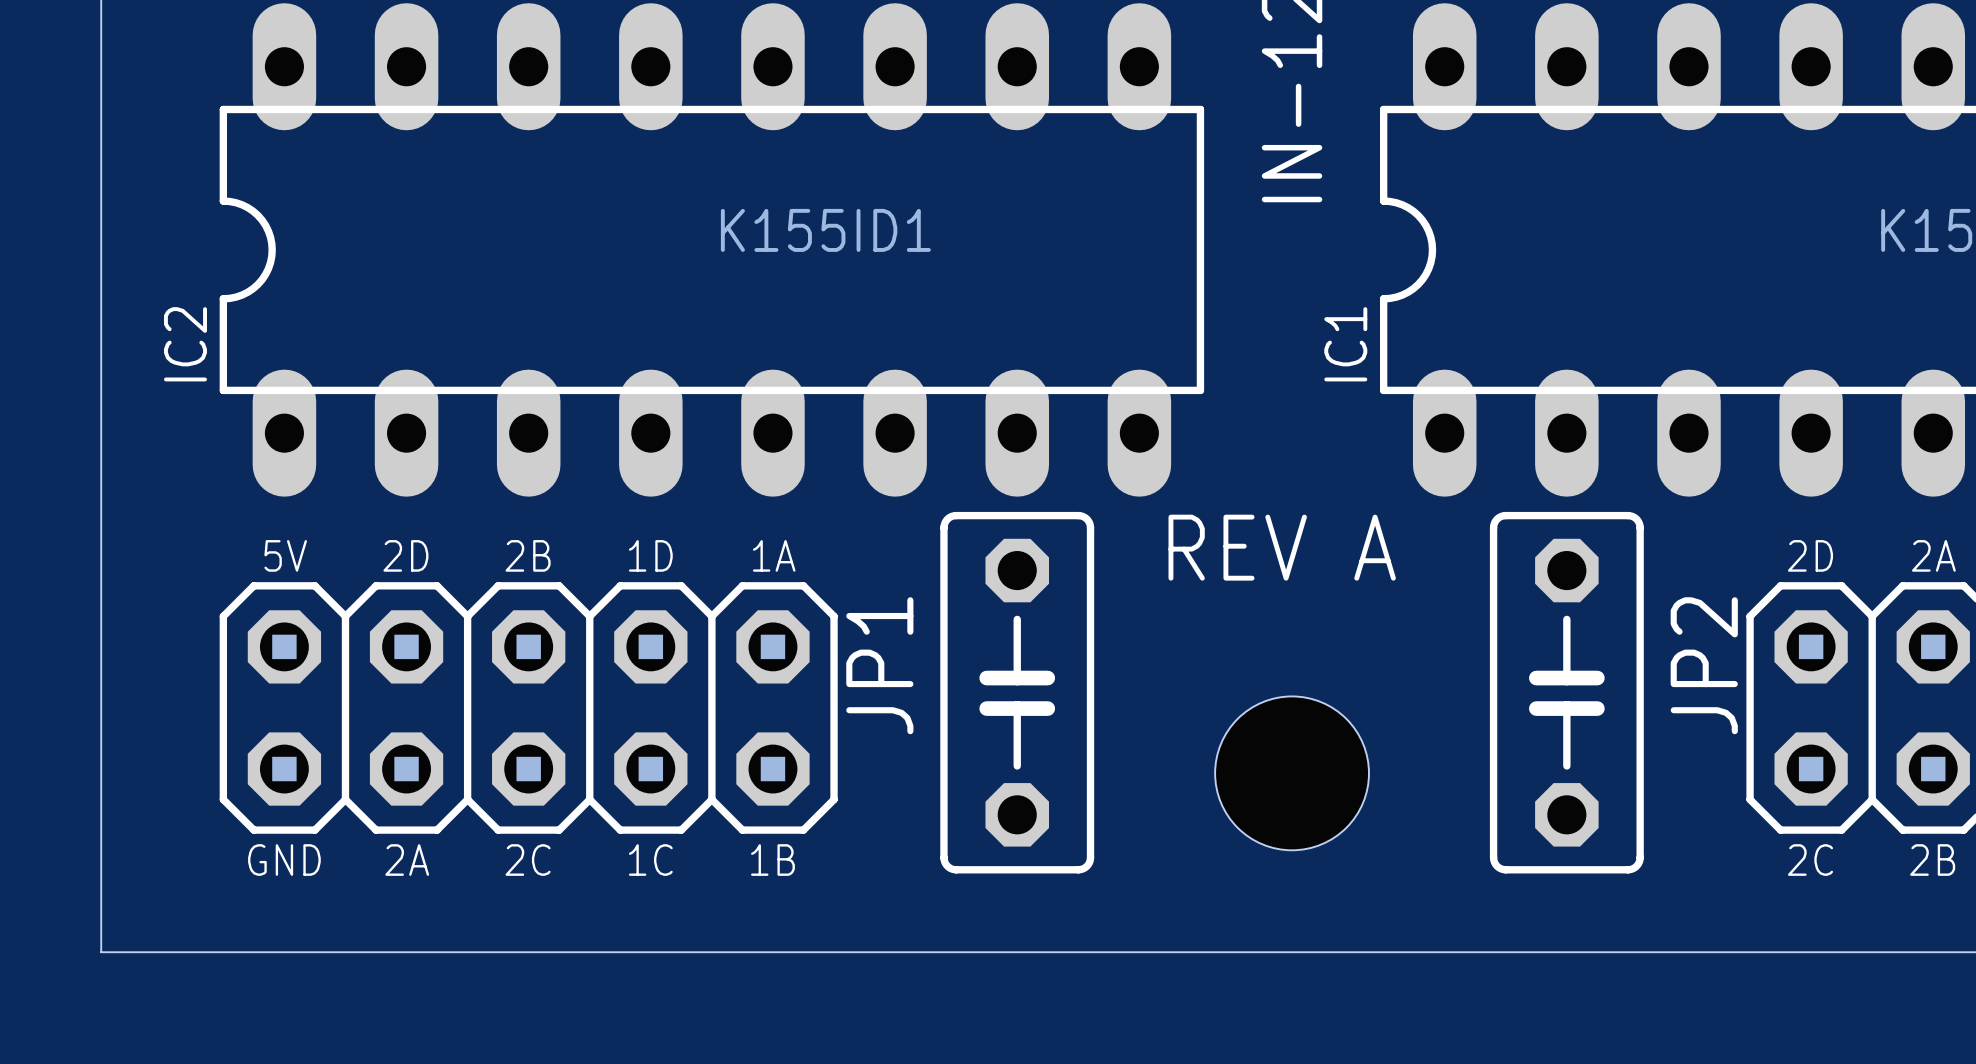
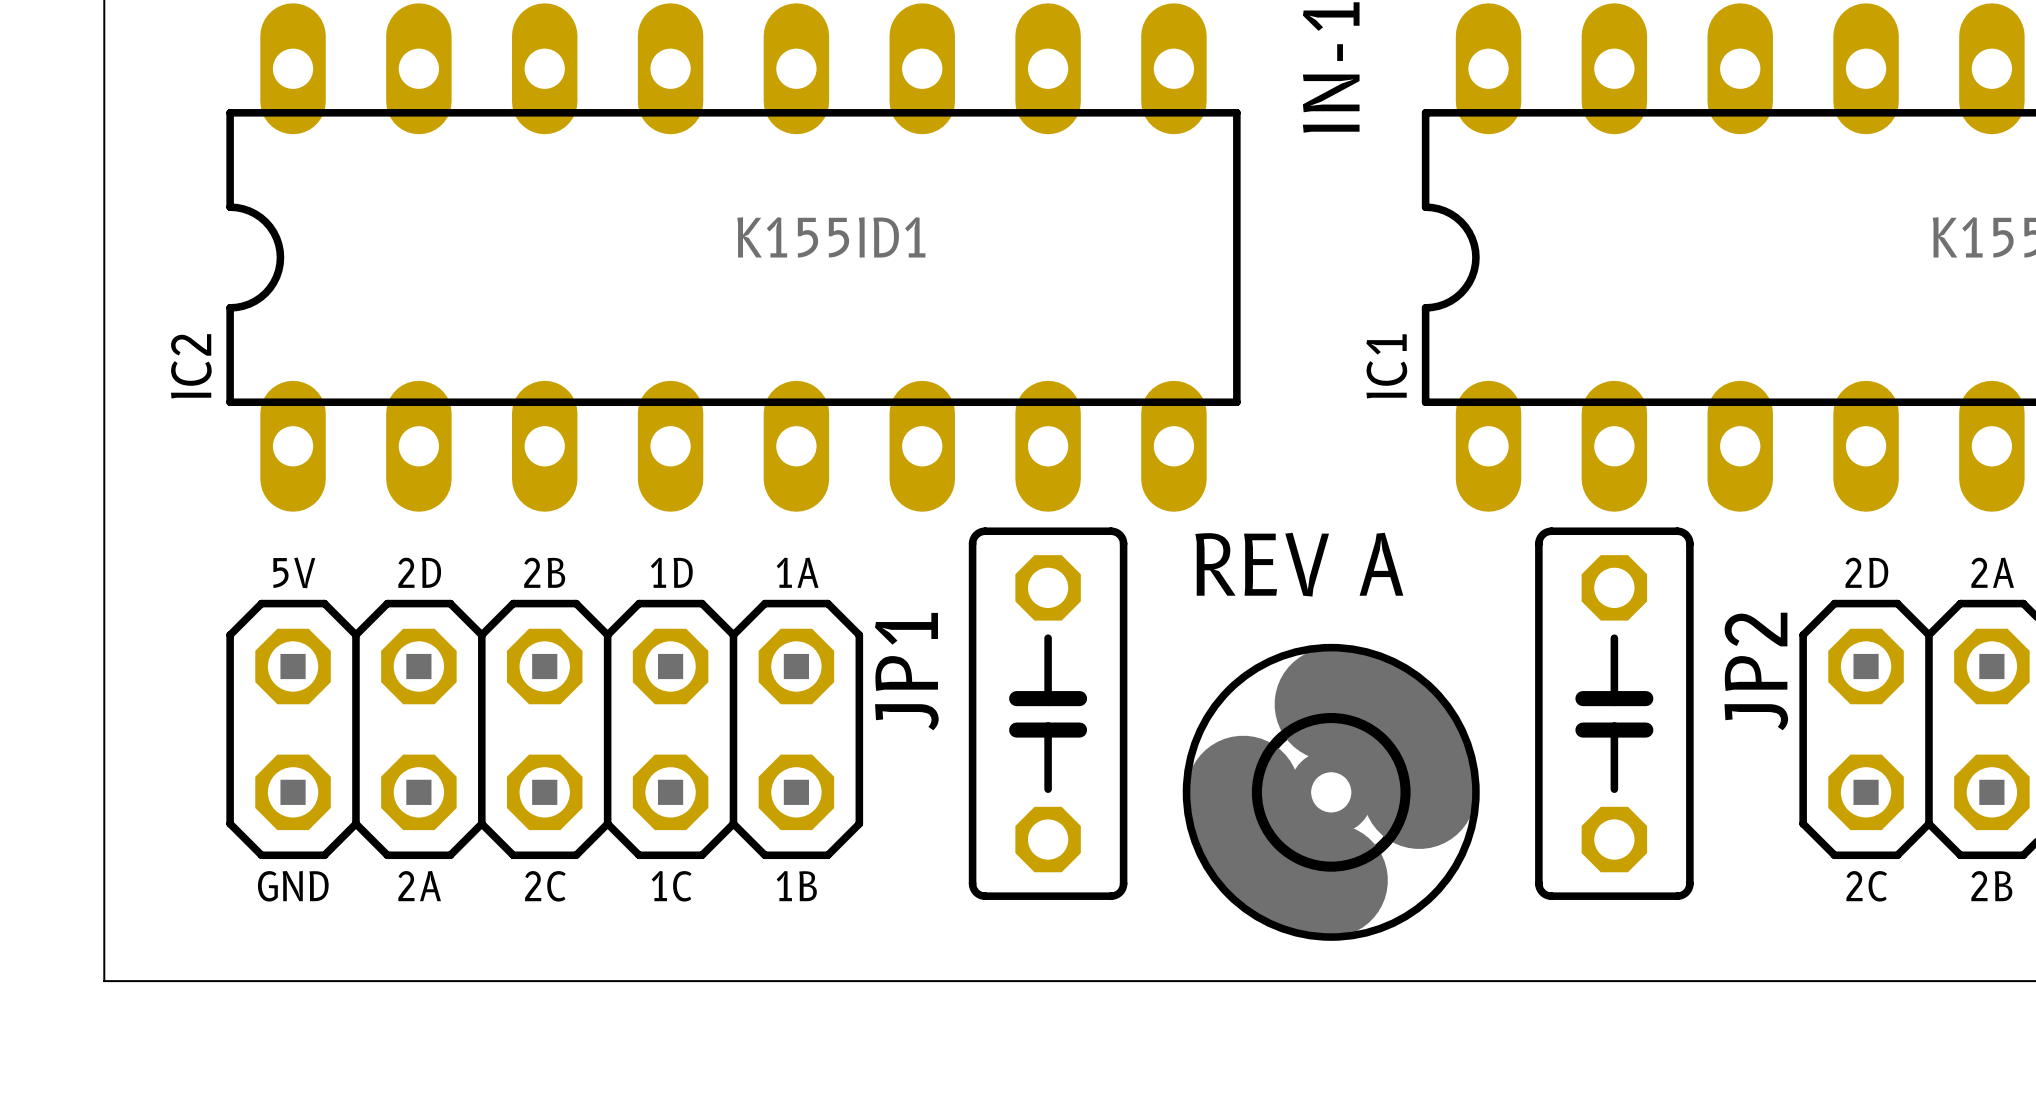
part: none -> (1331, 792)
hole: (1292, 773) -> none

